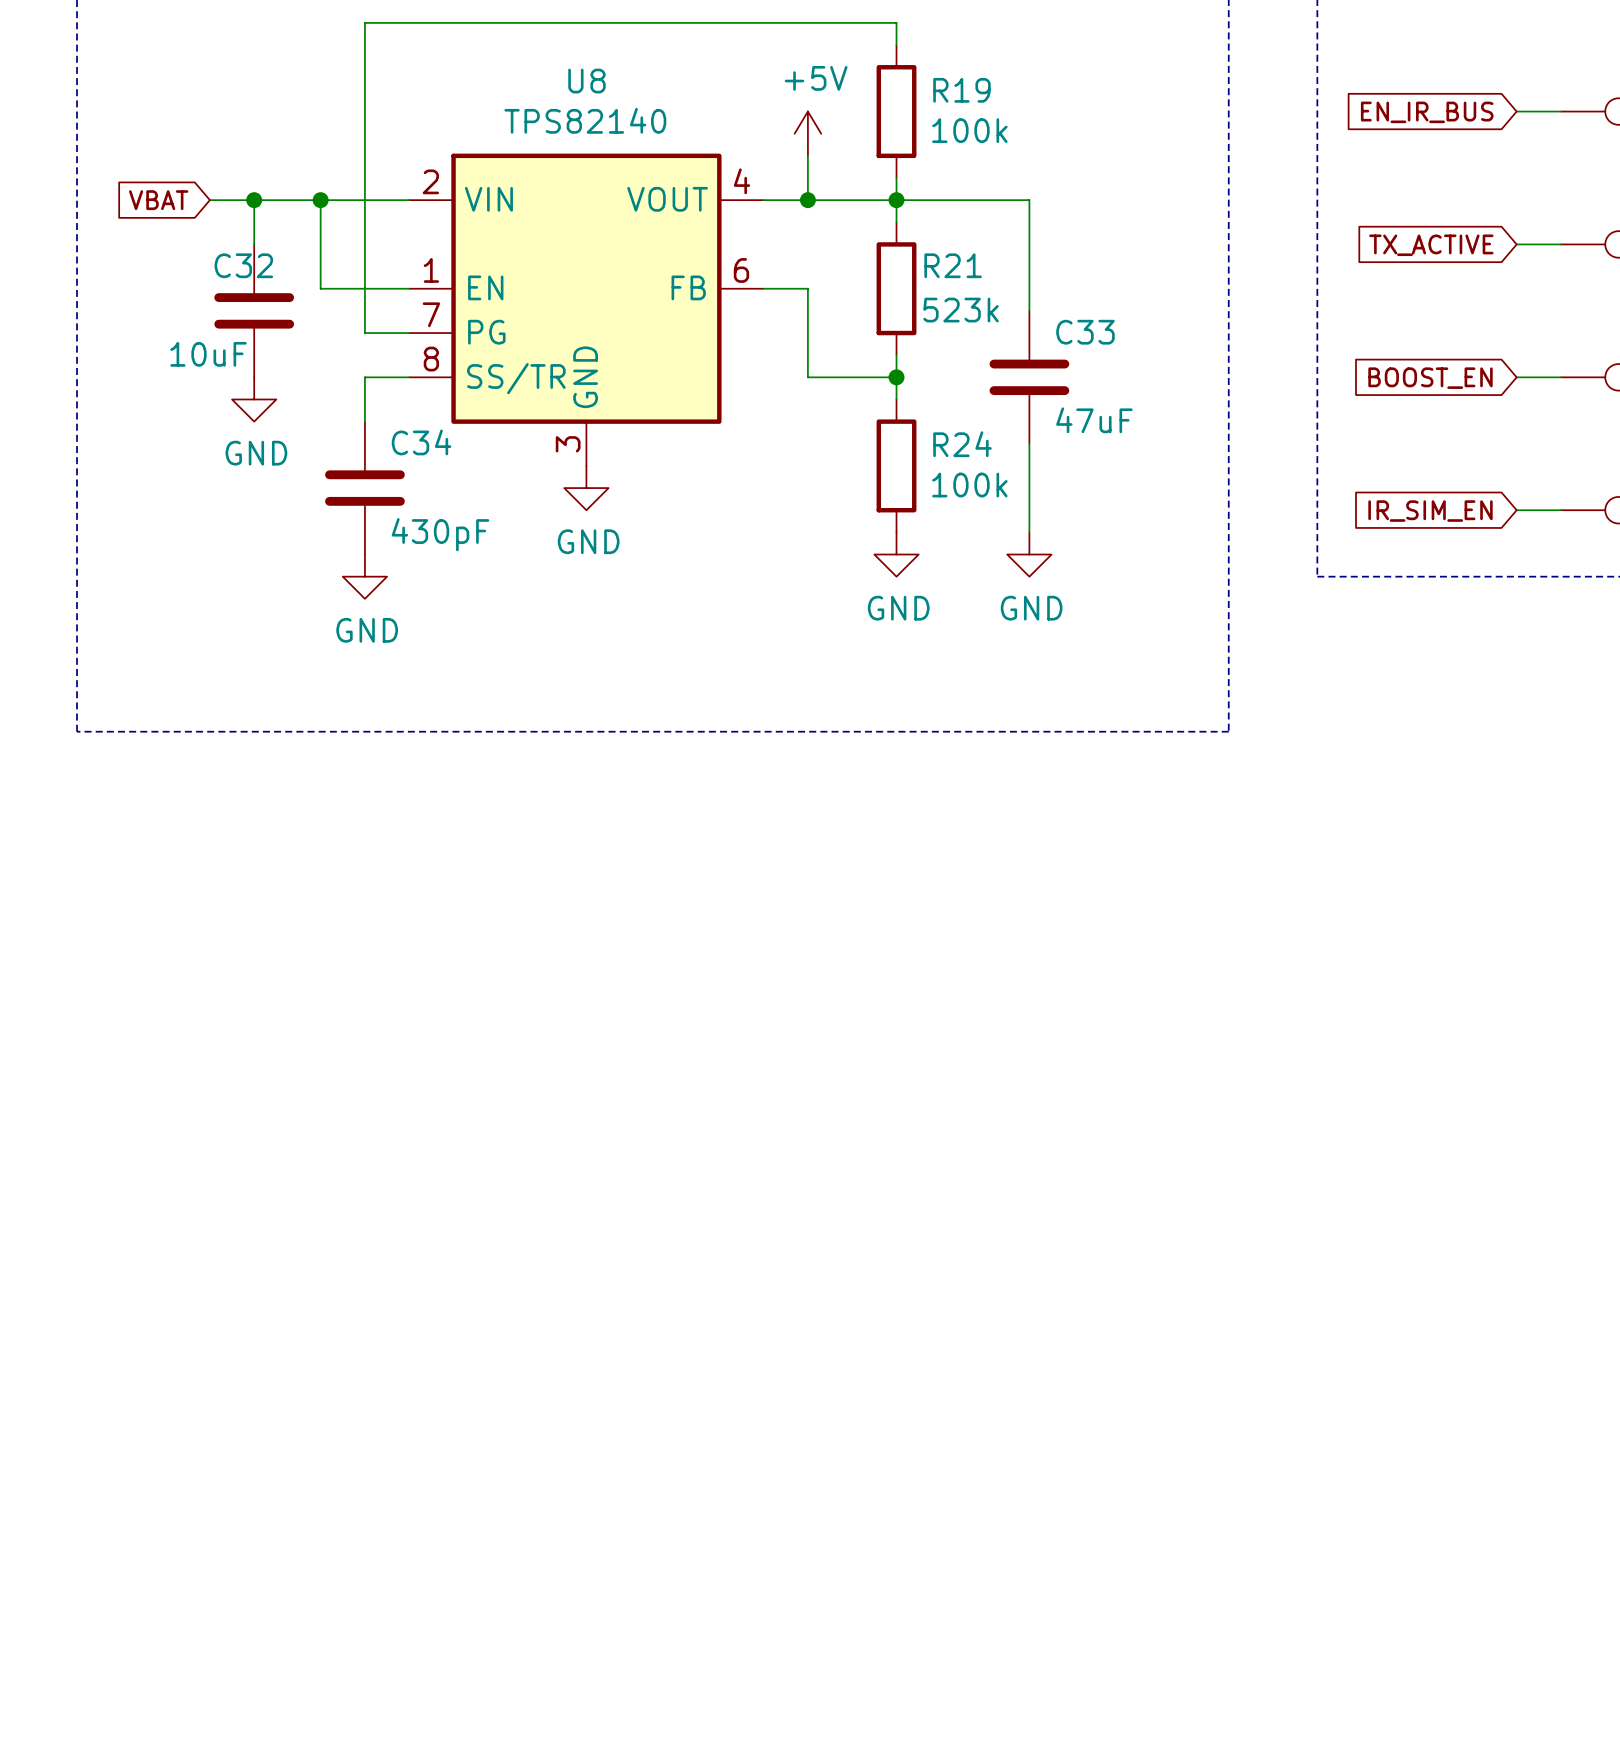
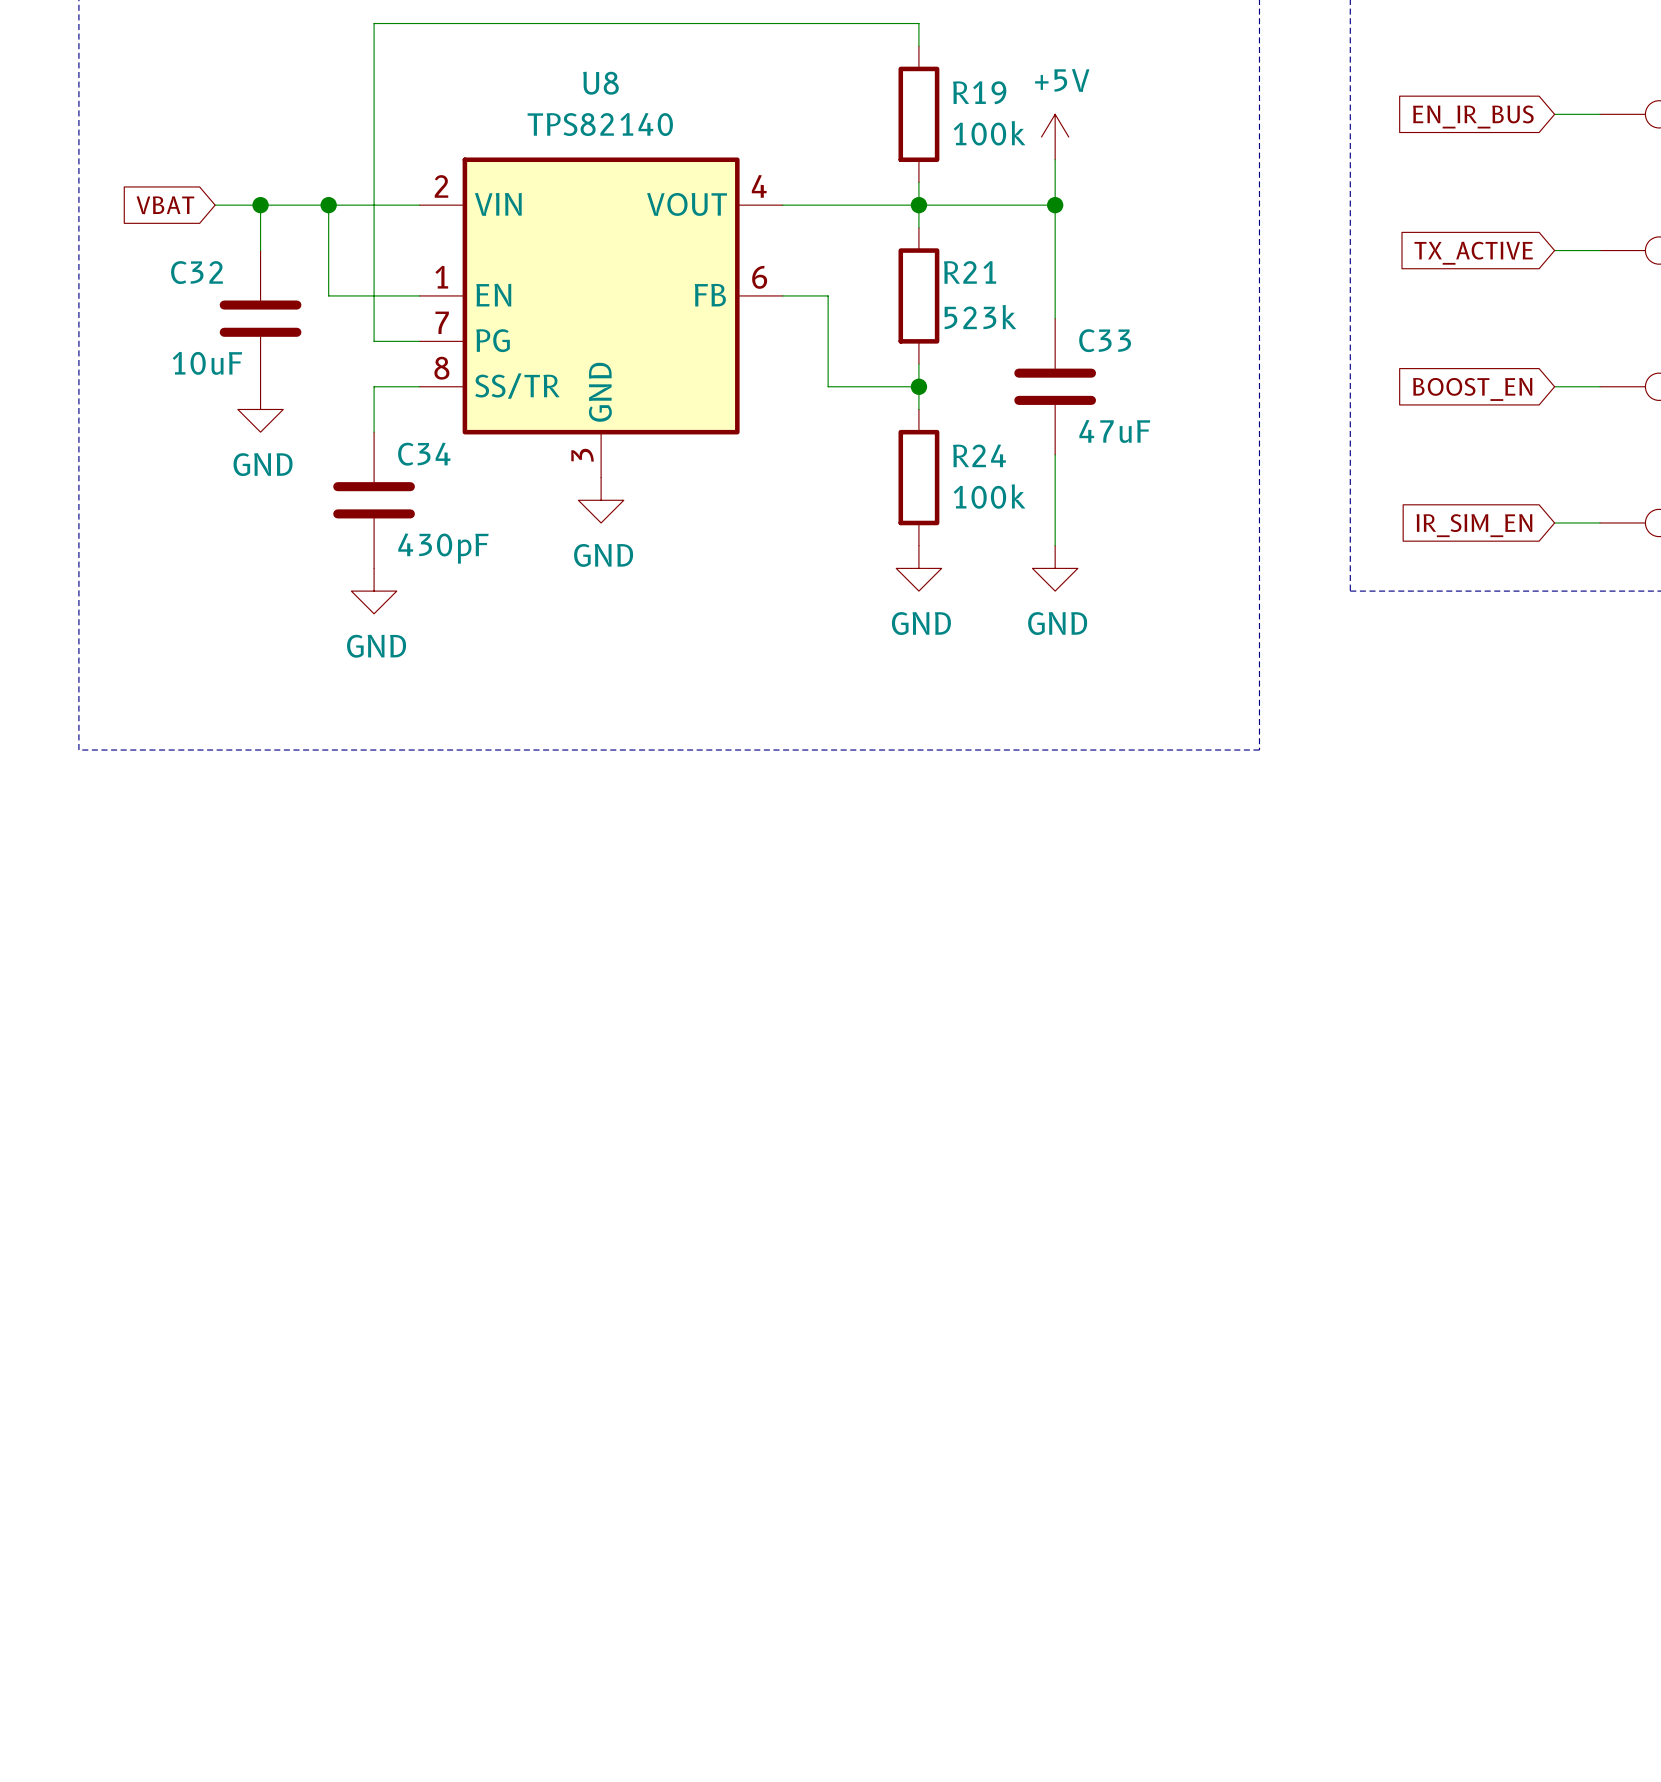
power symbol position: +5V (807, 133) -> +5V (1055, 137)
wire: (807, 155) (807, 200) -> (1055, 159) (1055, 205)
junction: (807, 200) -> none
junction: none -> (1055, 205)
C32 name position: C32 (243, 265) -> C32 (196, 272)

